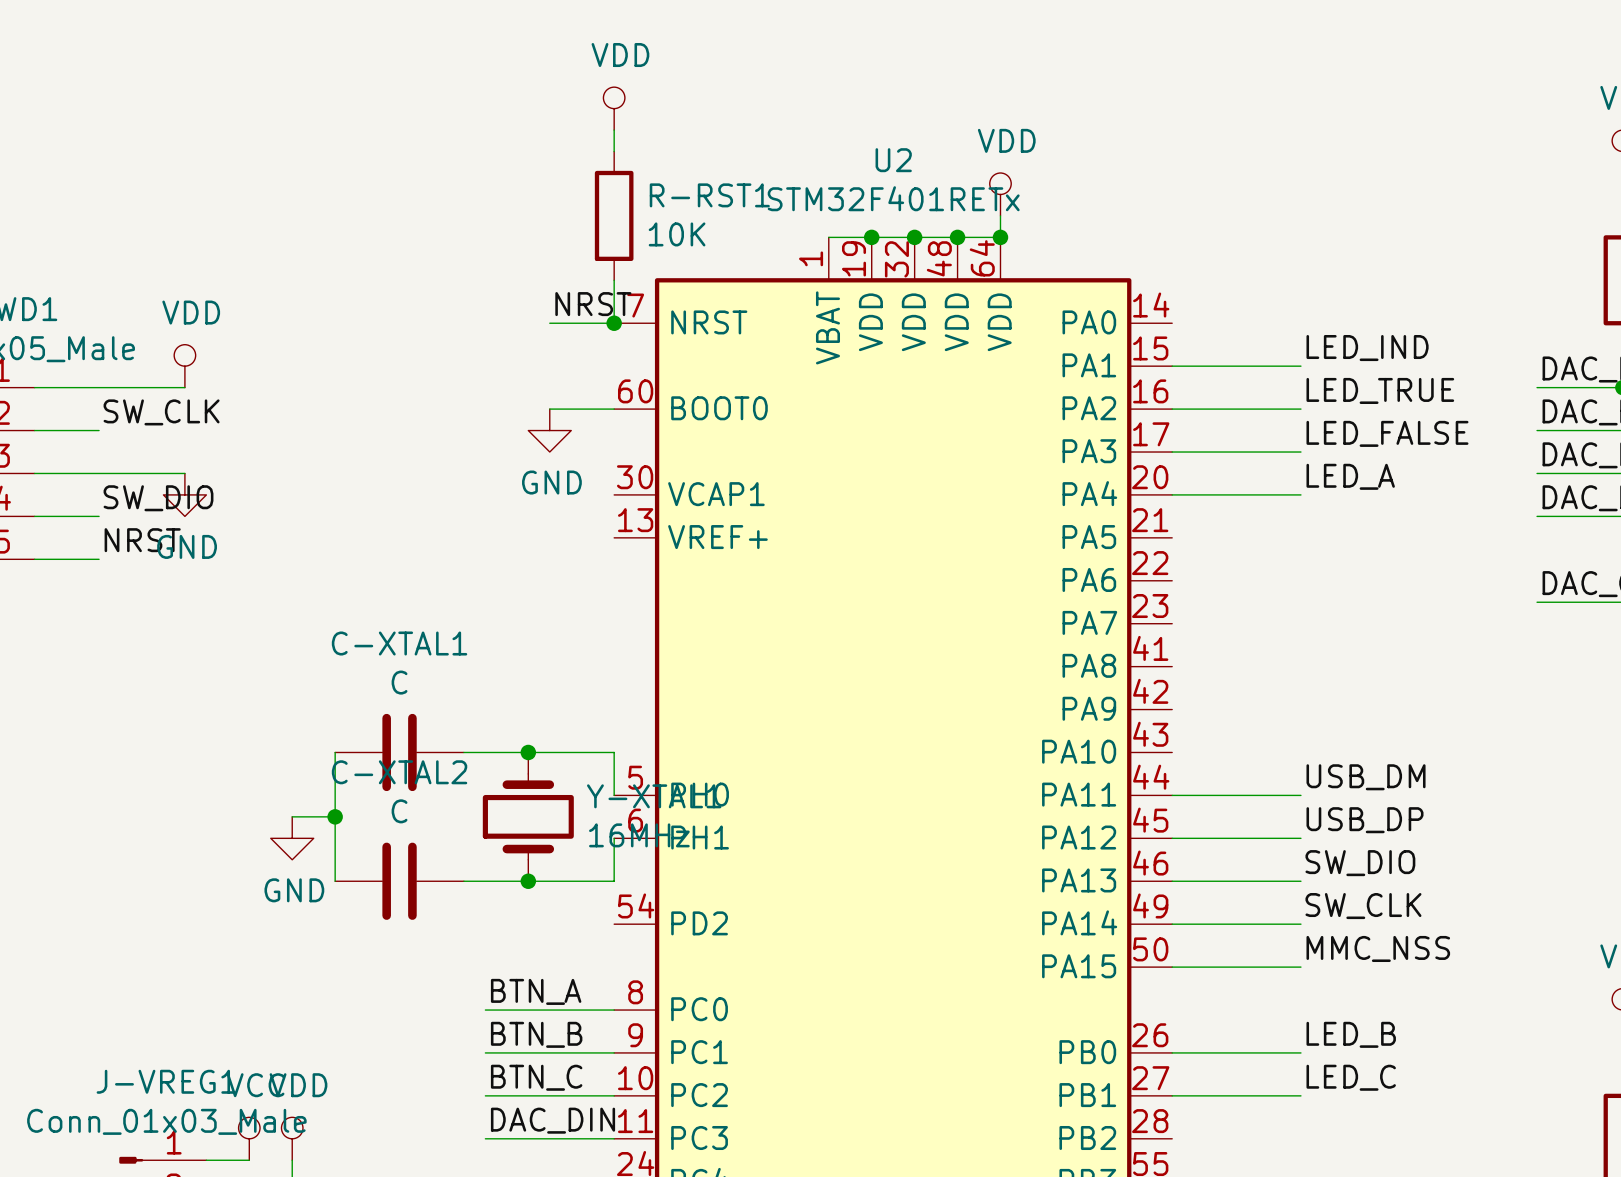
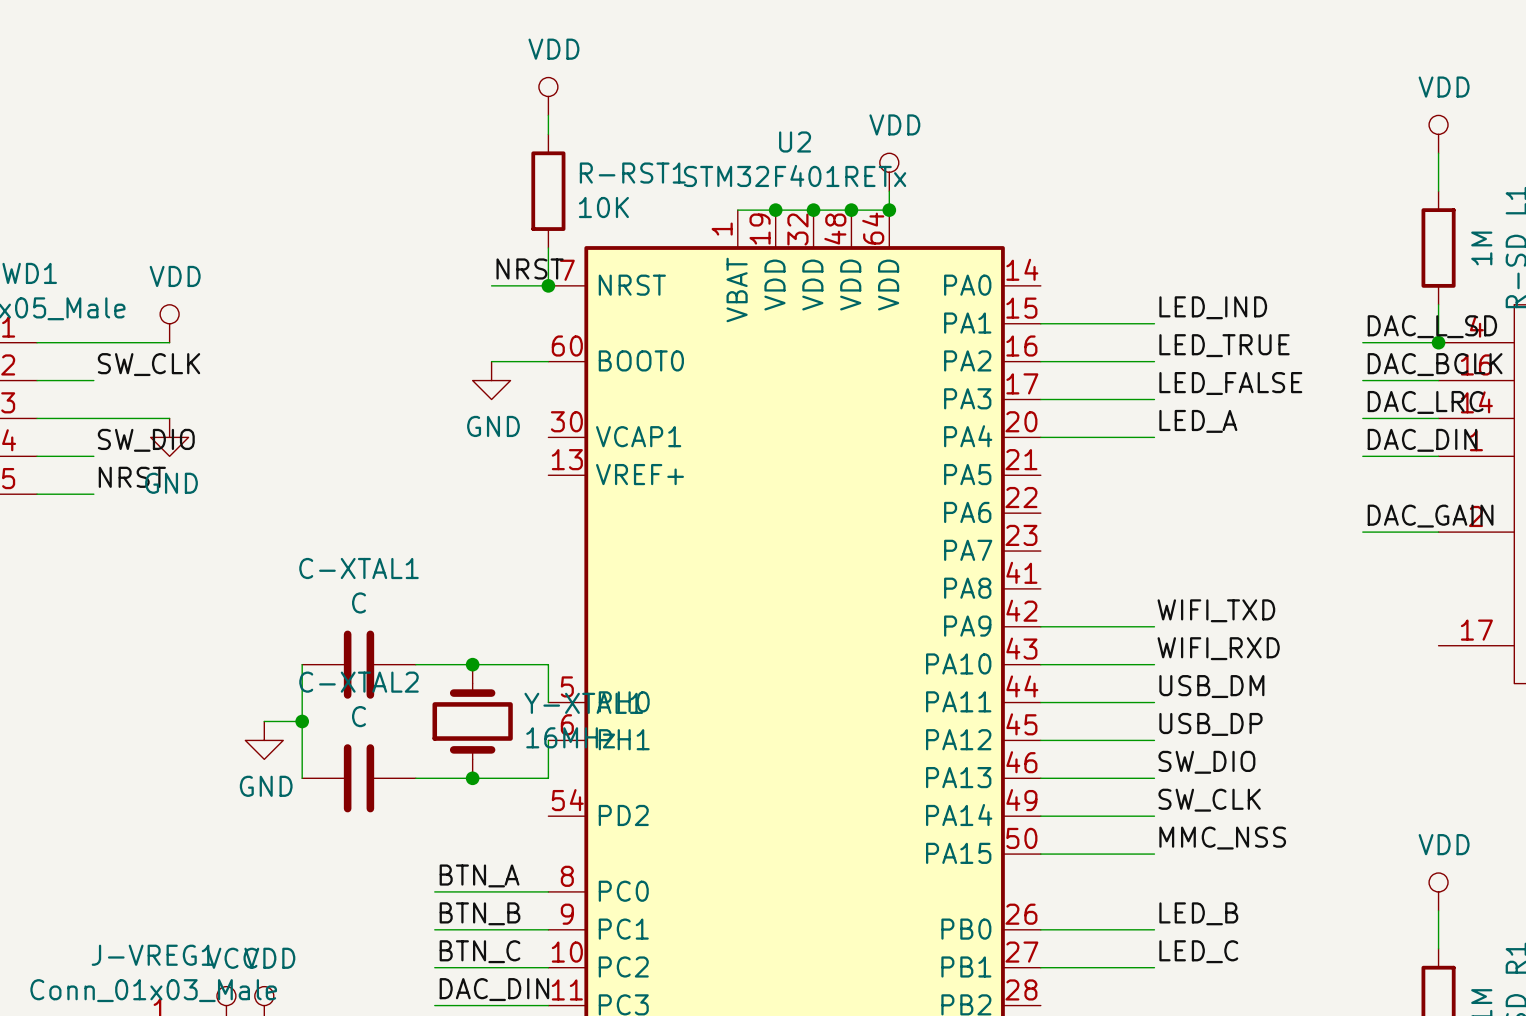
label: none -> WIFI_TXD (1216, 610)
wire: none -> (1040, 626) (1154, 626)
label: none -> WIFI_RXD (1218, 648)
wire: none -> (1040, 664) (1154, 664)

